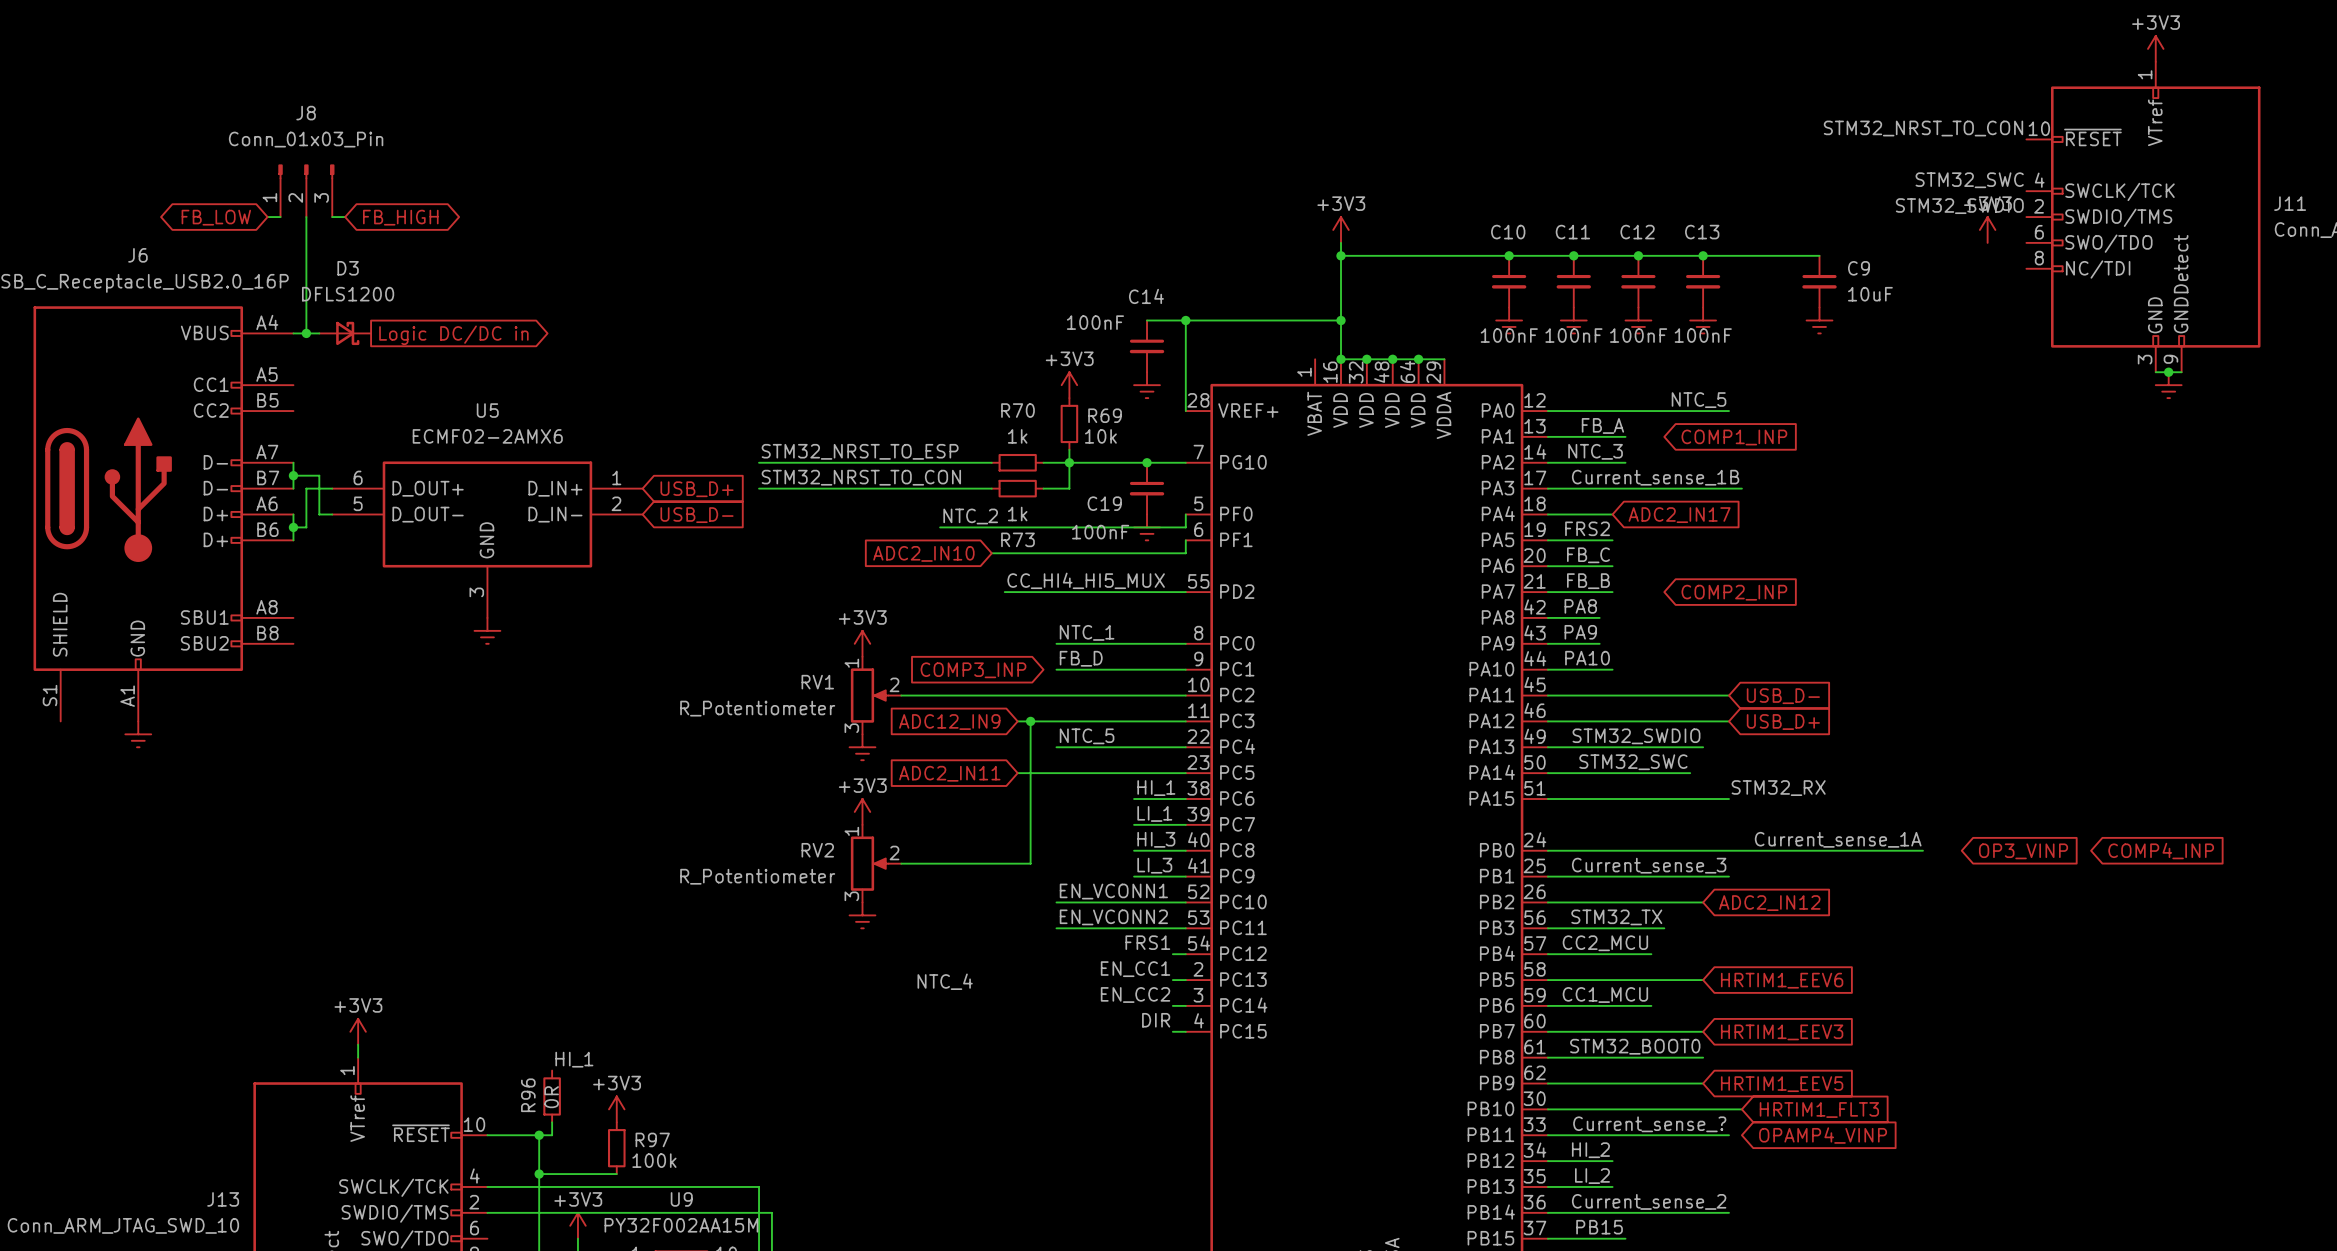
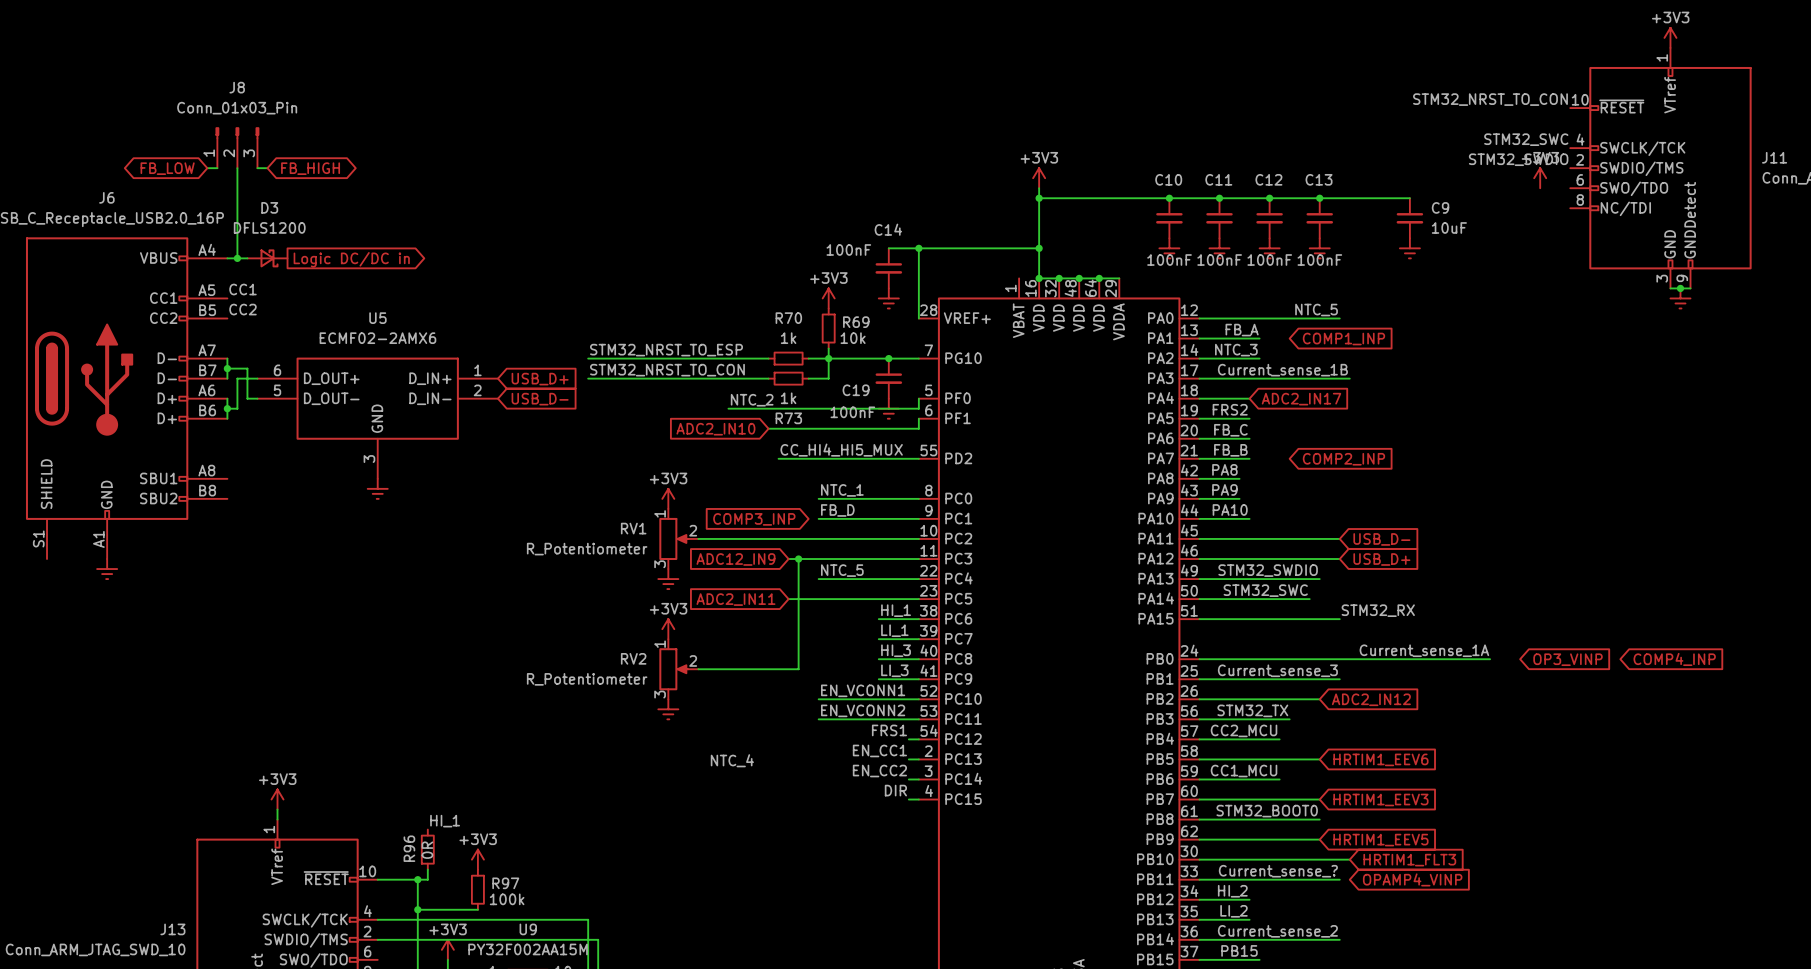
label: none -> CC1 (242, 289)
label: none -> CC2 (242, 309)

